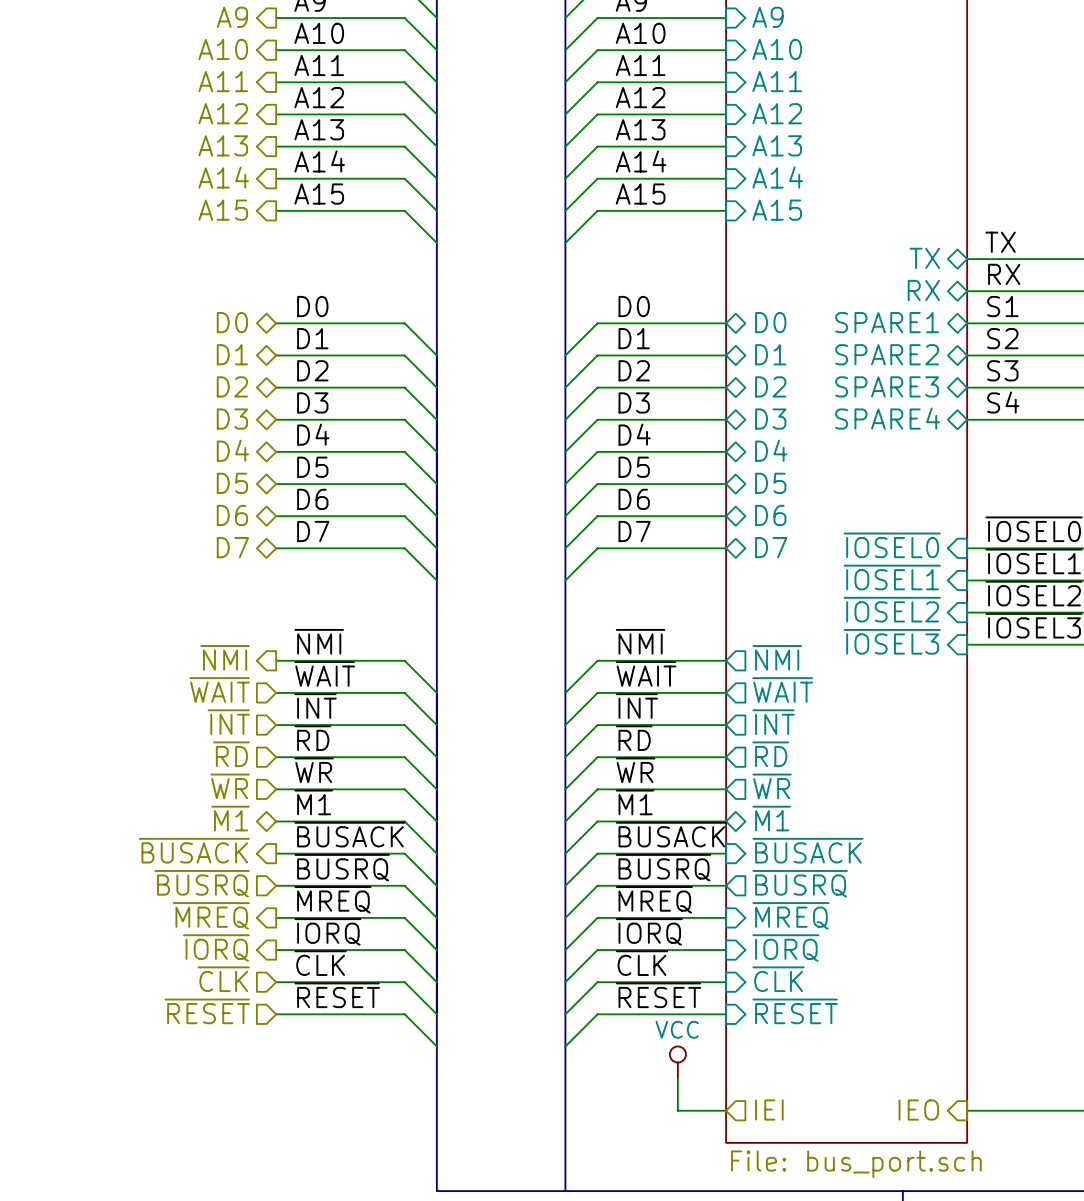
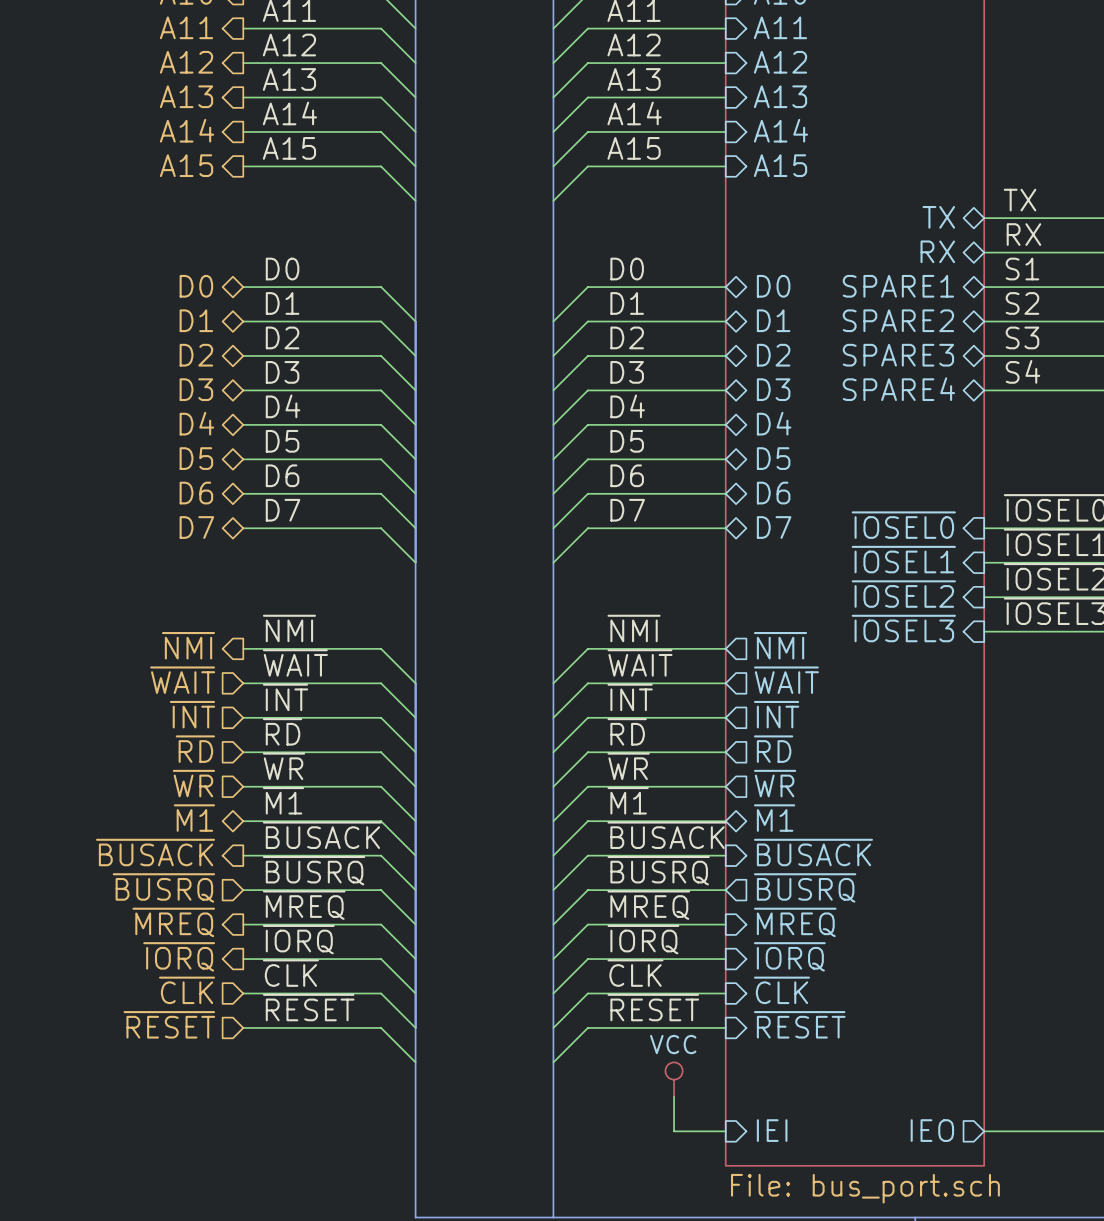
hierarchical label: IEI (769, 1110) -> none
sheet pin: none -> IEI (772, 1130)
hierarchical label: IEO (918, 1110) -> none
sheet pin: none -> IEO (932, 1130)

